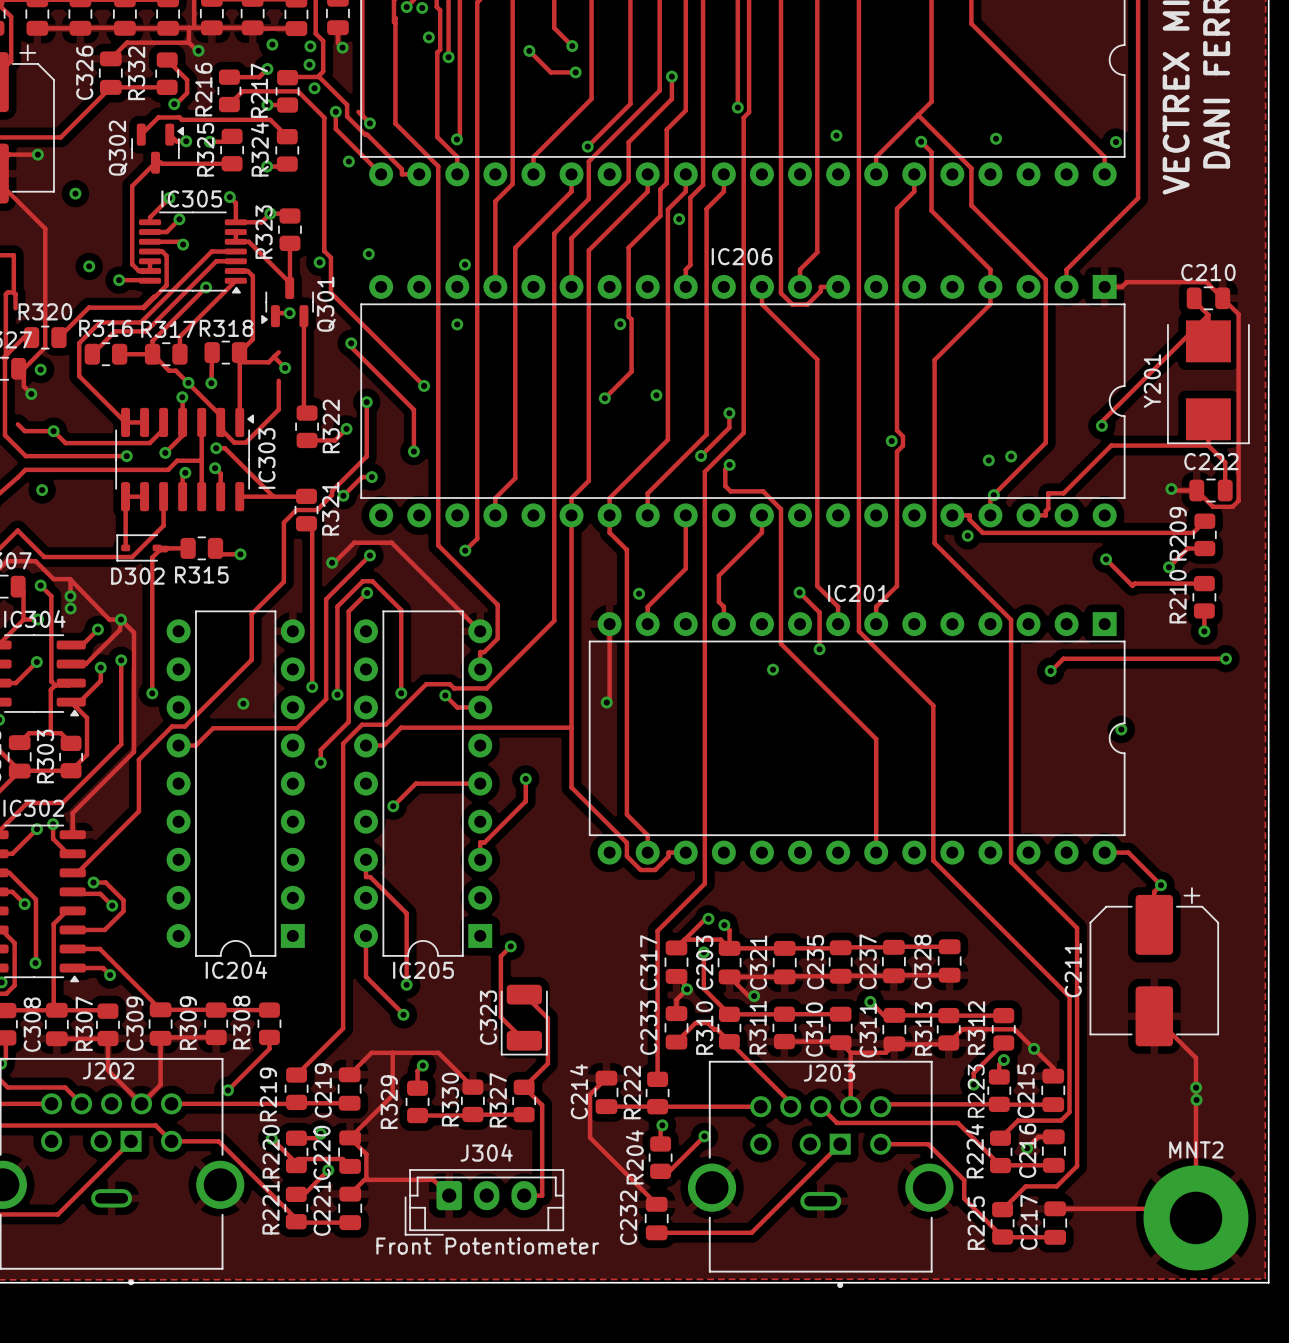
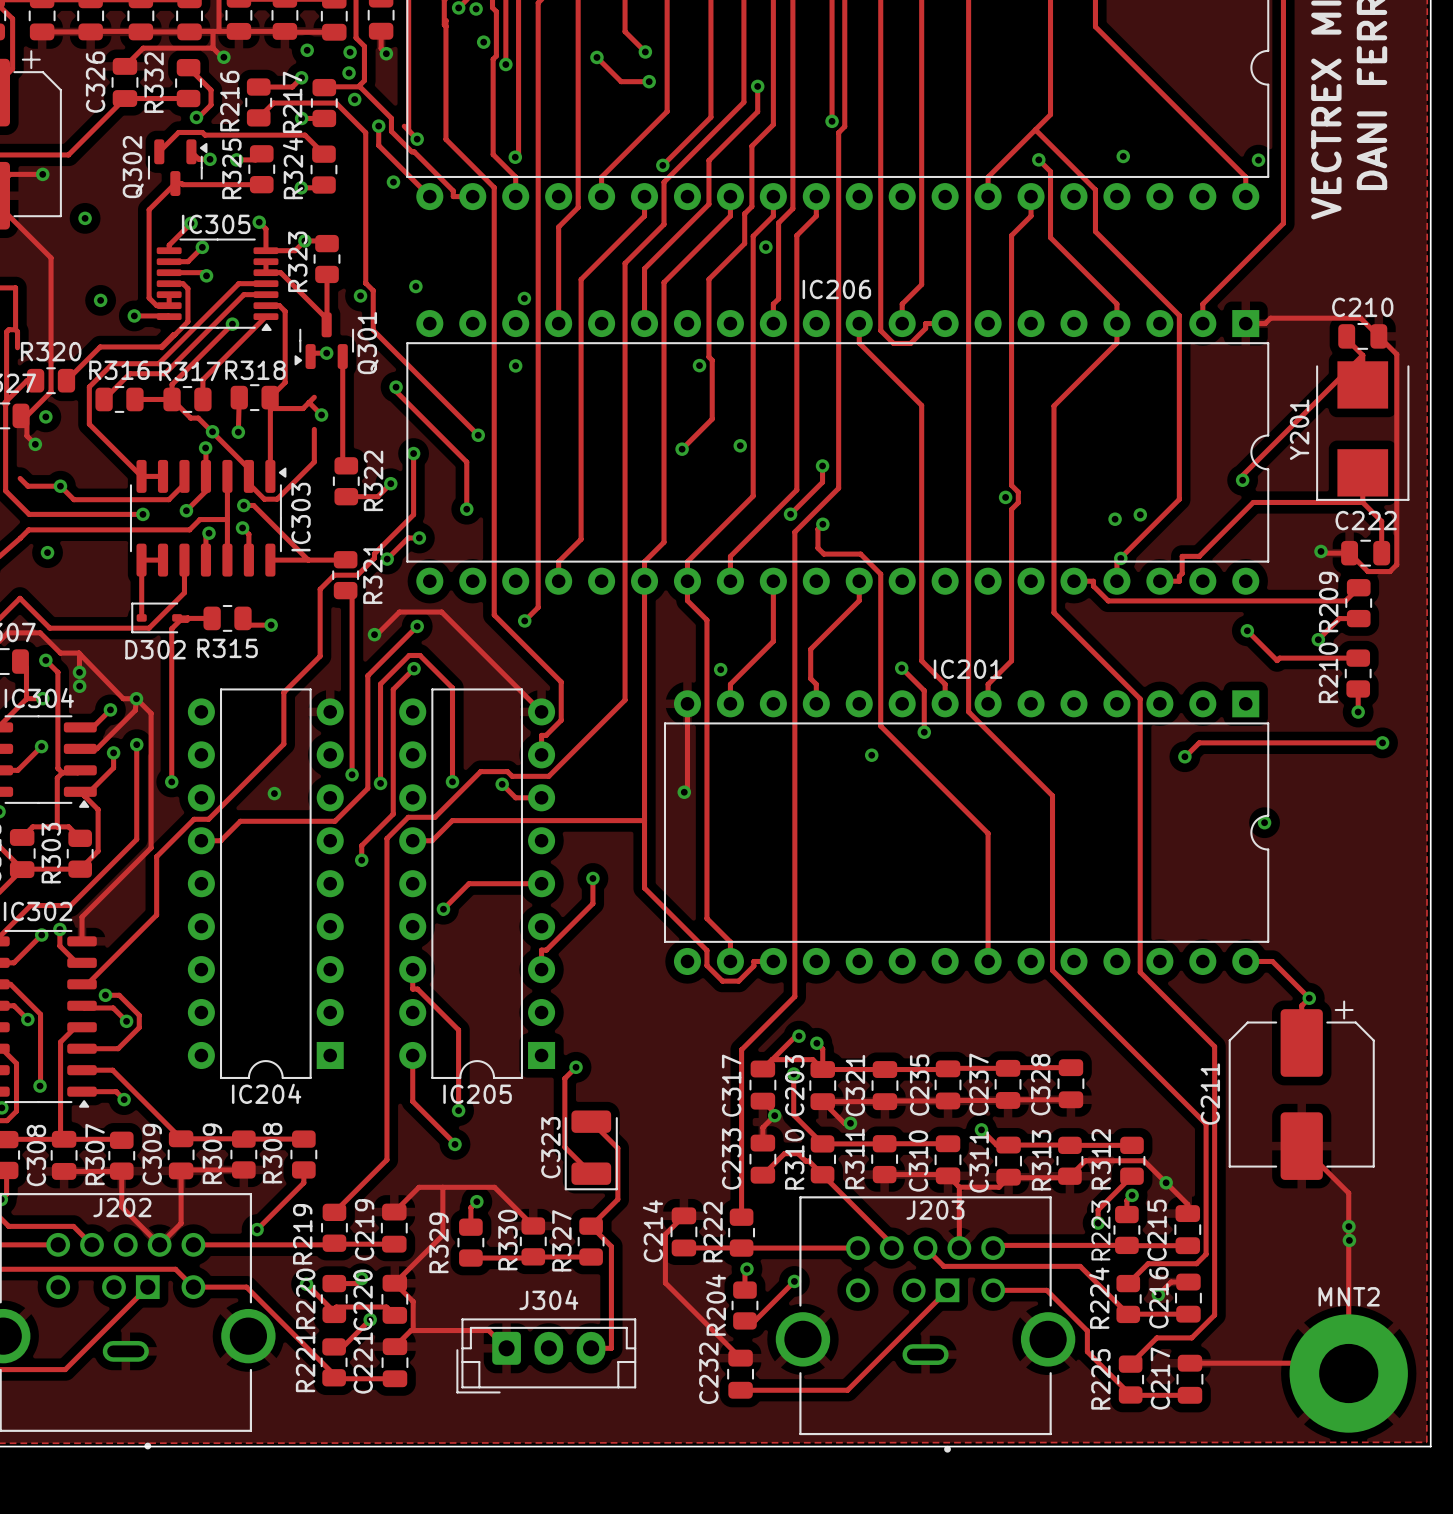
via: (836, 135) -> none
via: (967, 535) -> none
J304 value: Front Potentiometer (487, 1246) -> none

